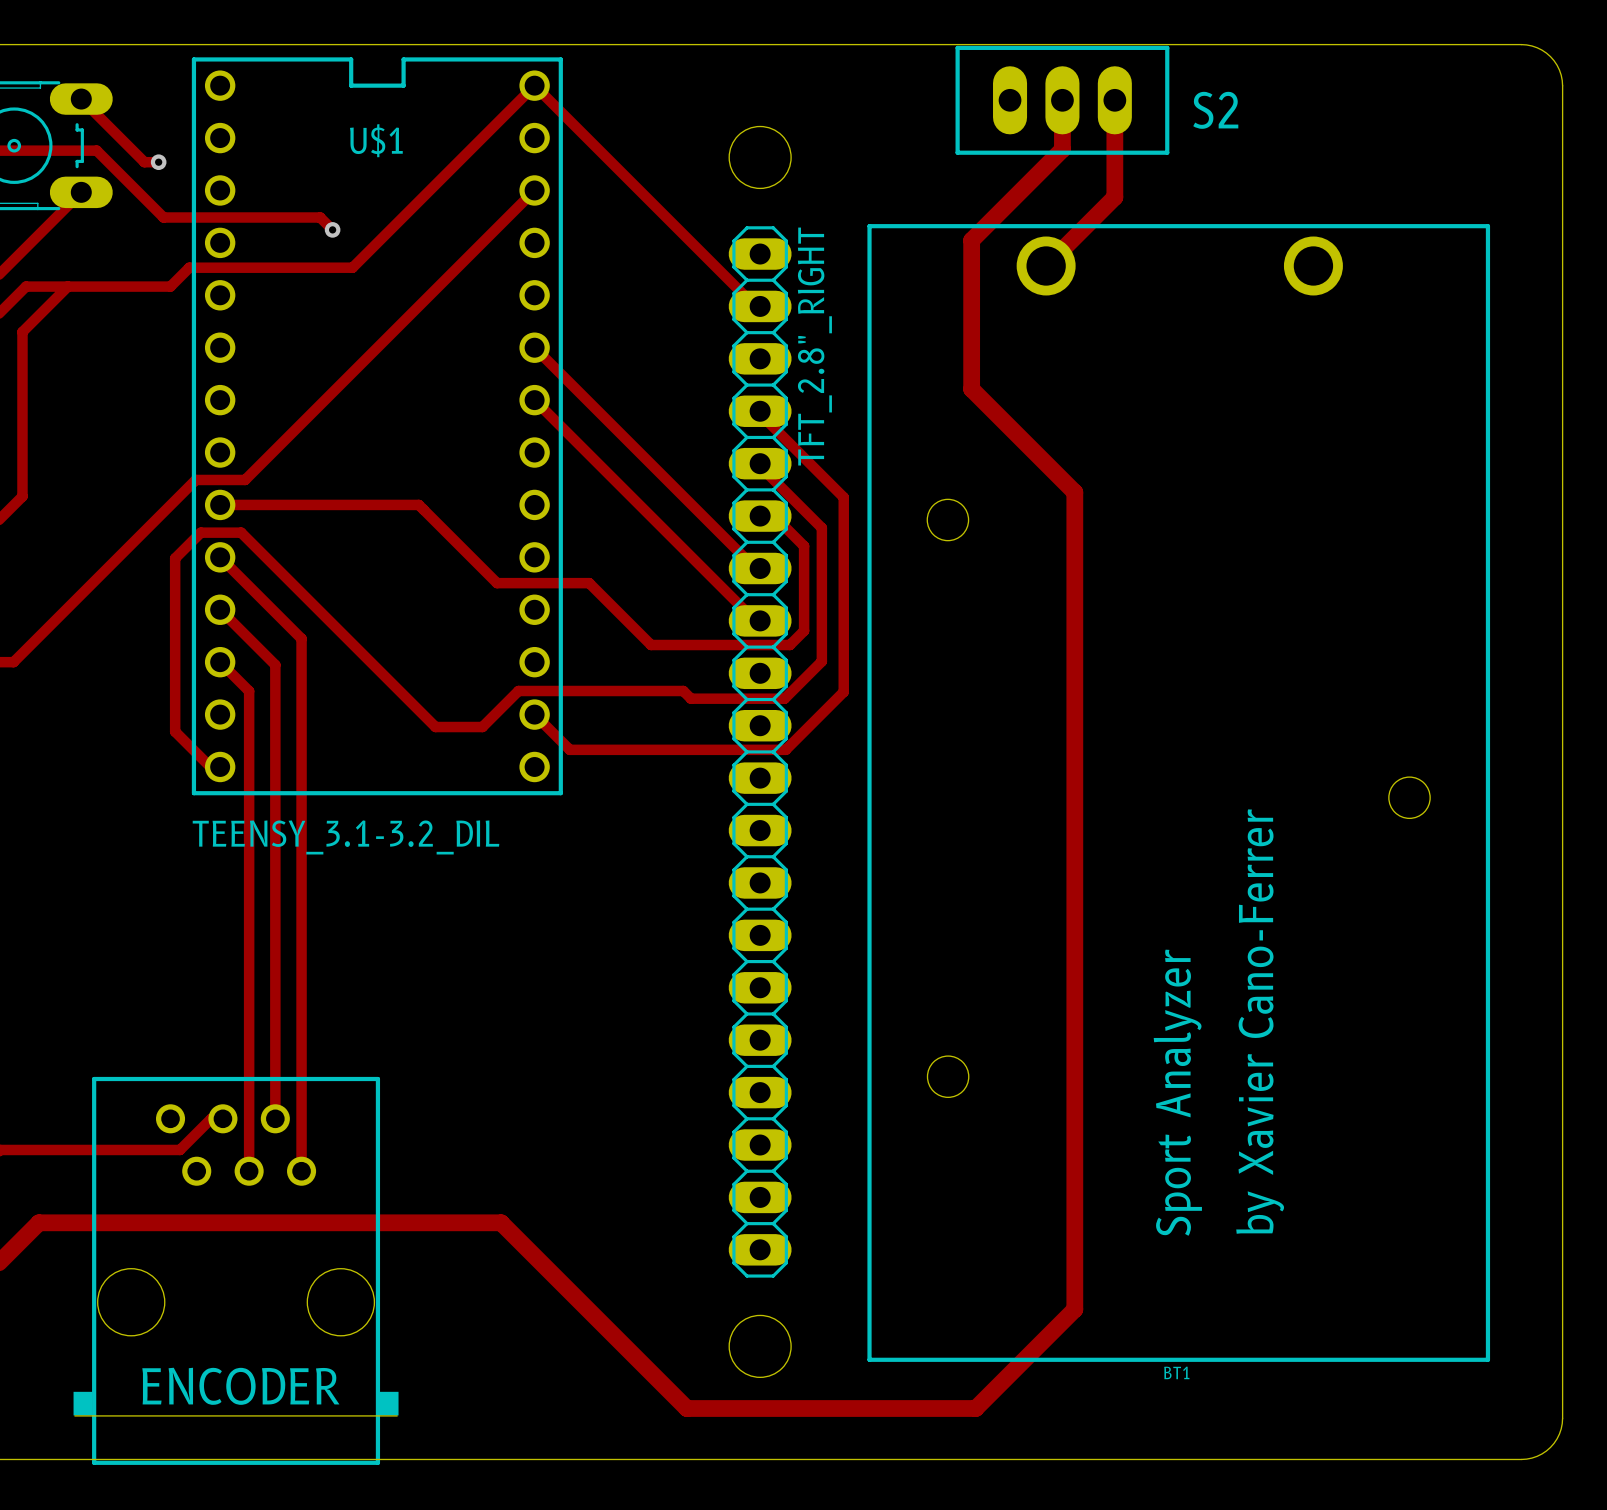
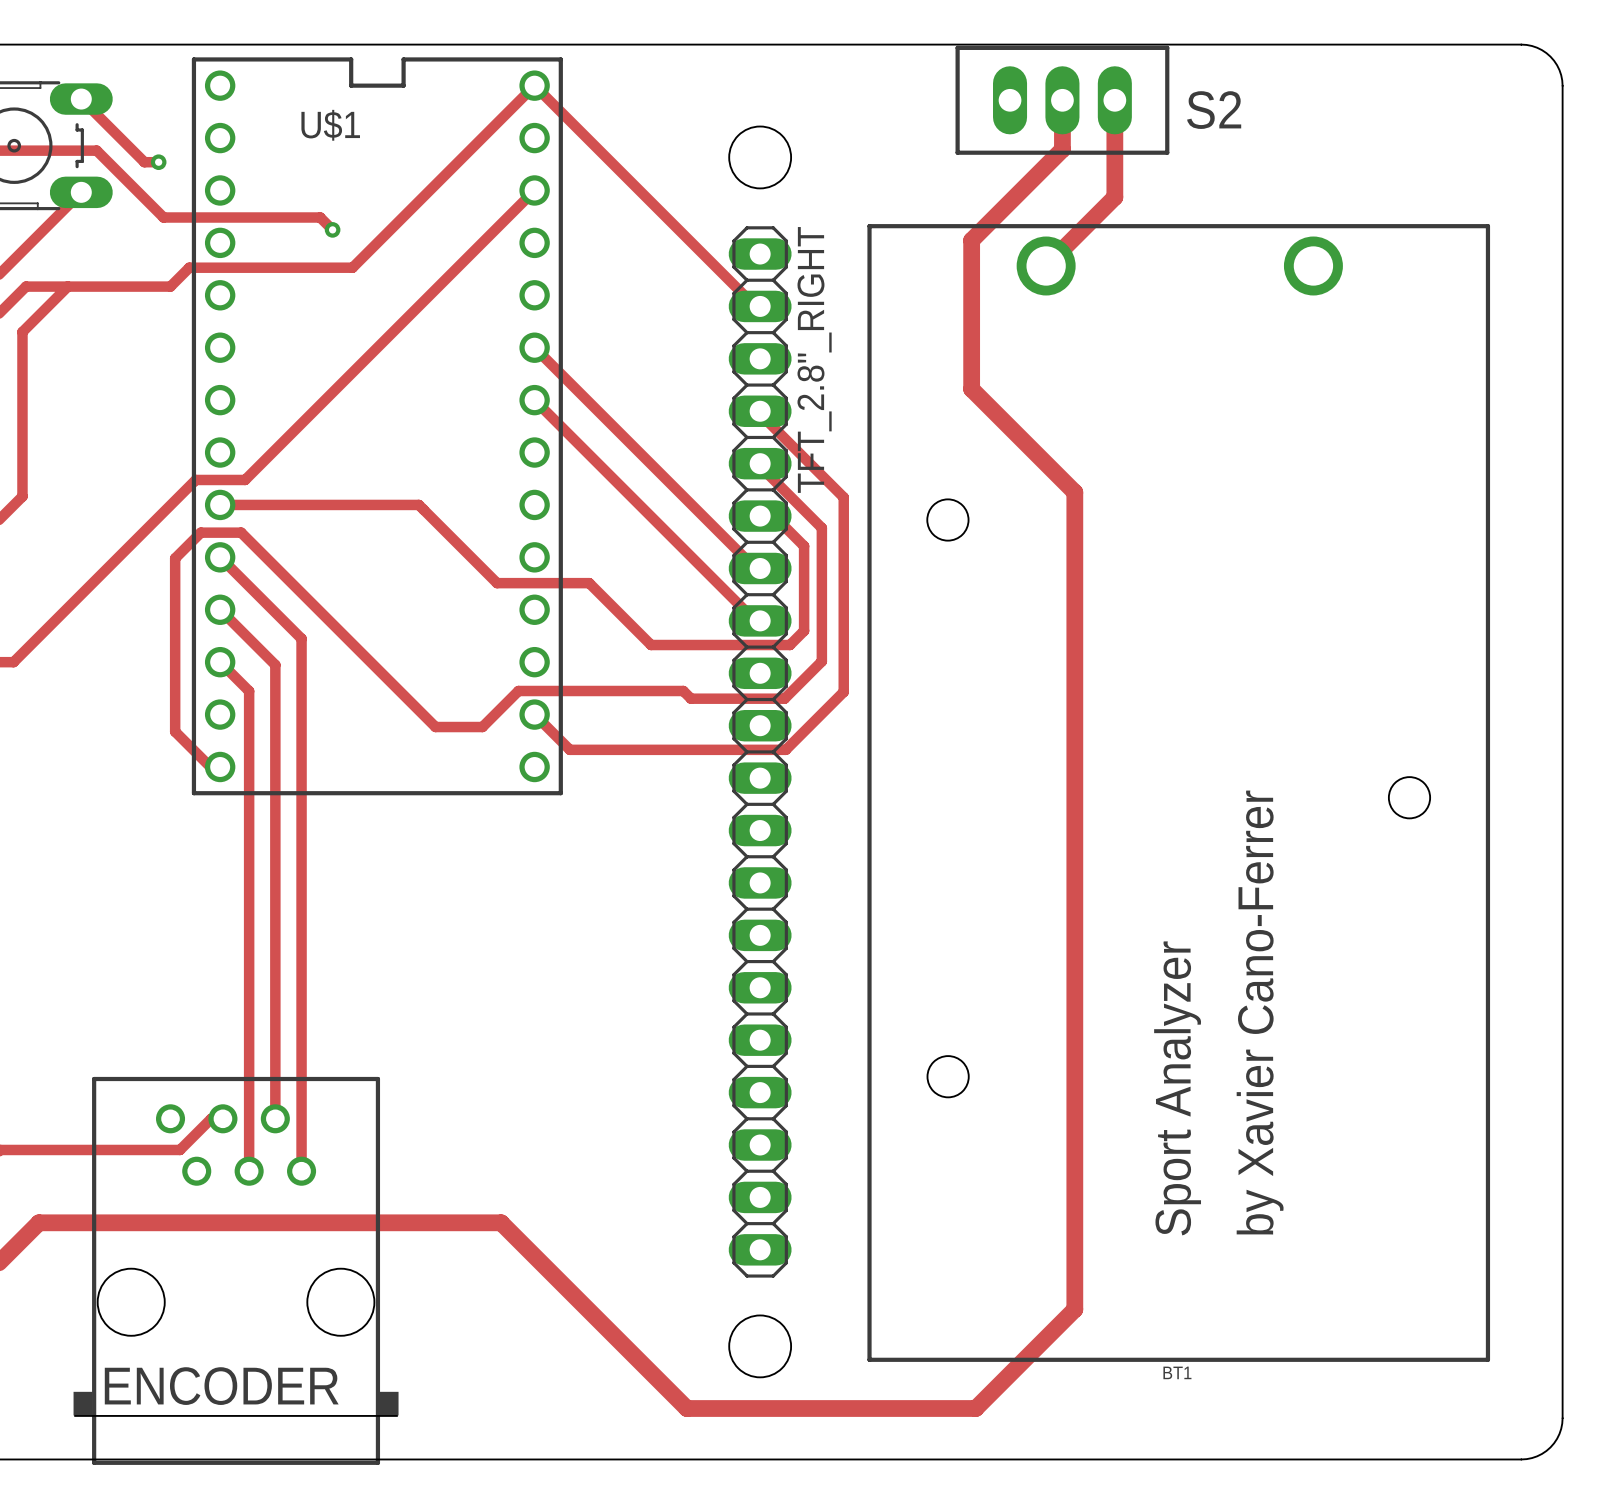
U$1 name position: U$1 (376, 140) -> U$1 (330, 125)
U$1 value: TEENSY_3.1-3.2_DIL (346, 837) -> none

